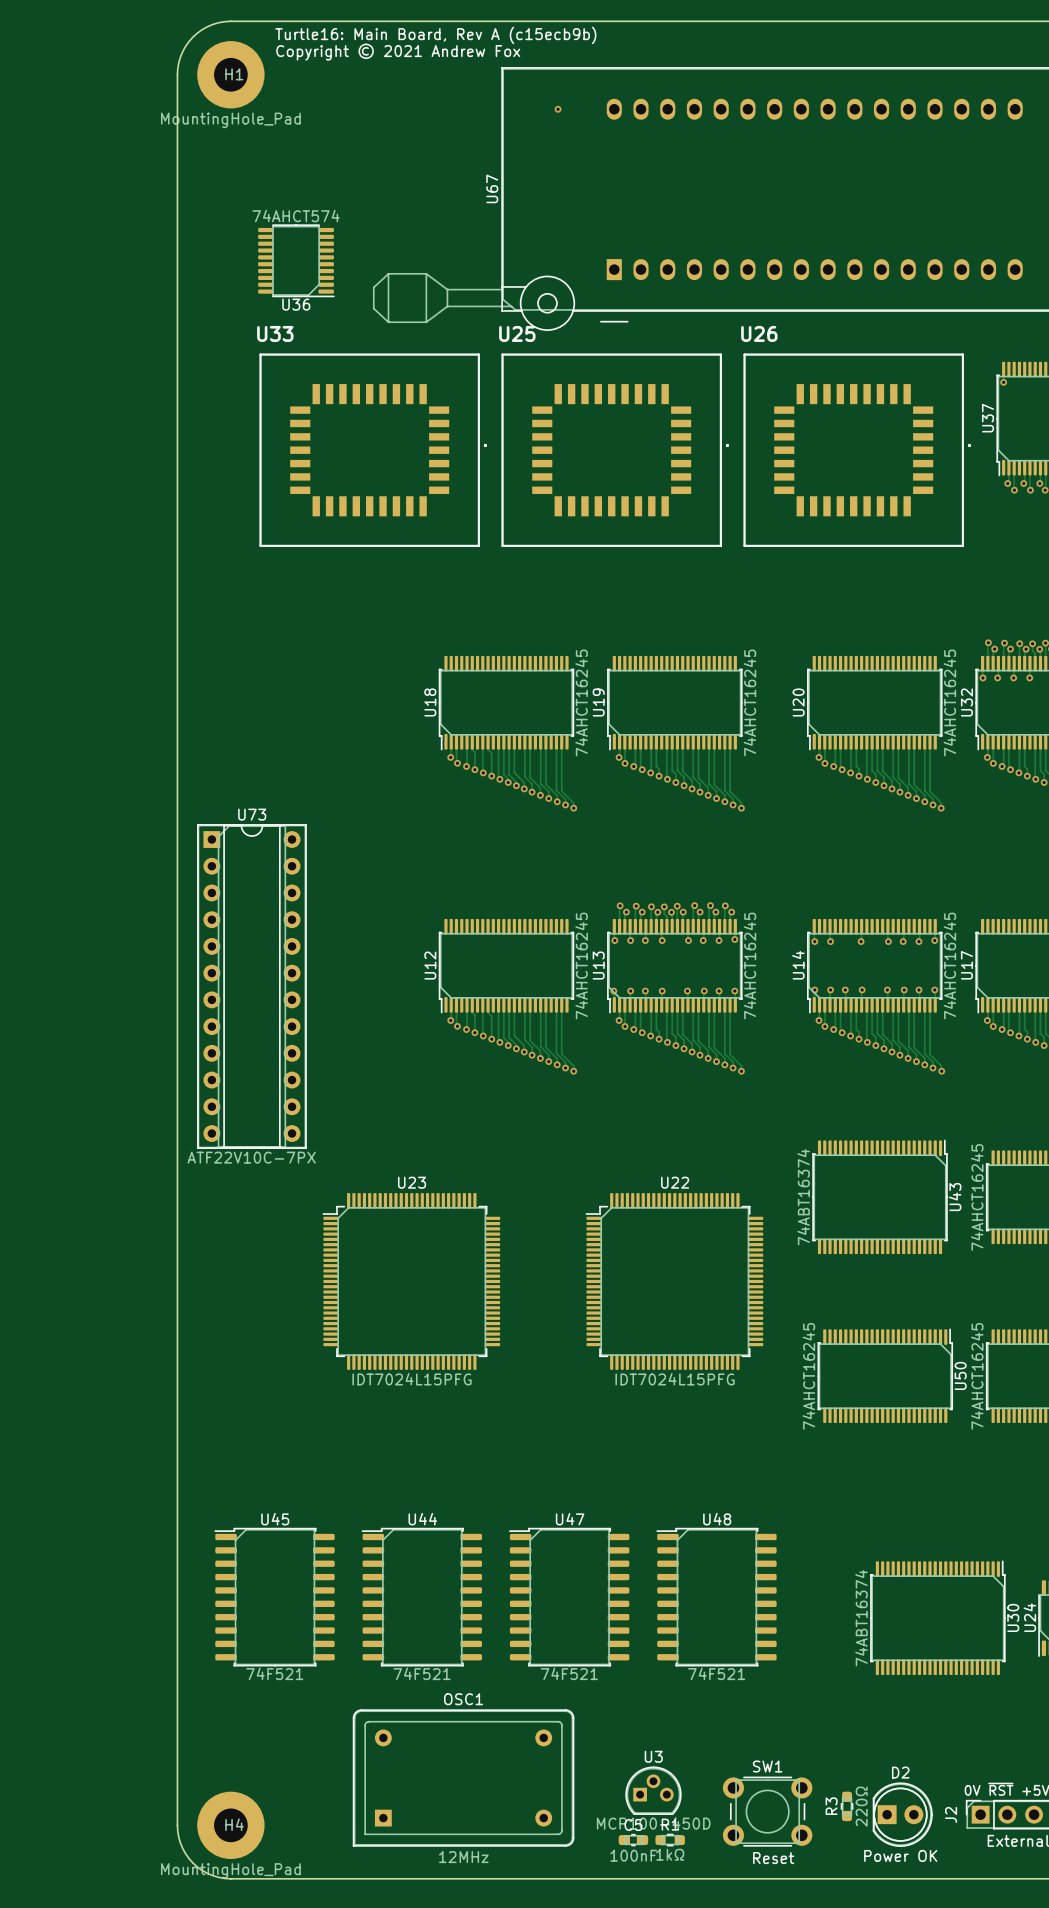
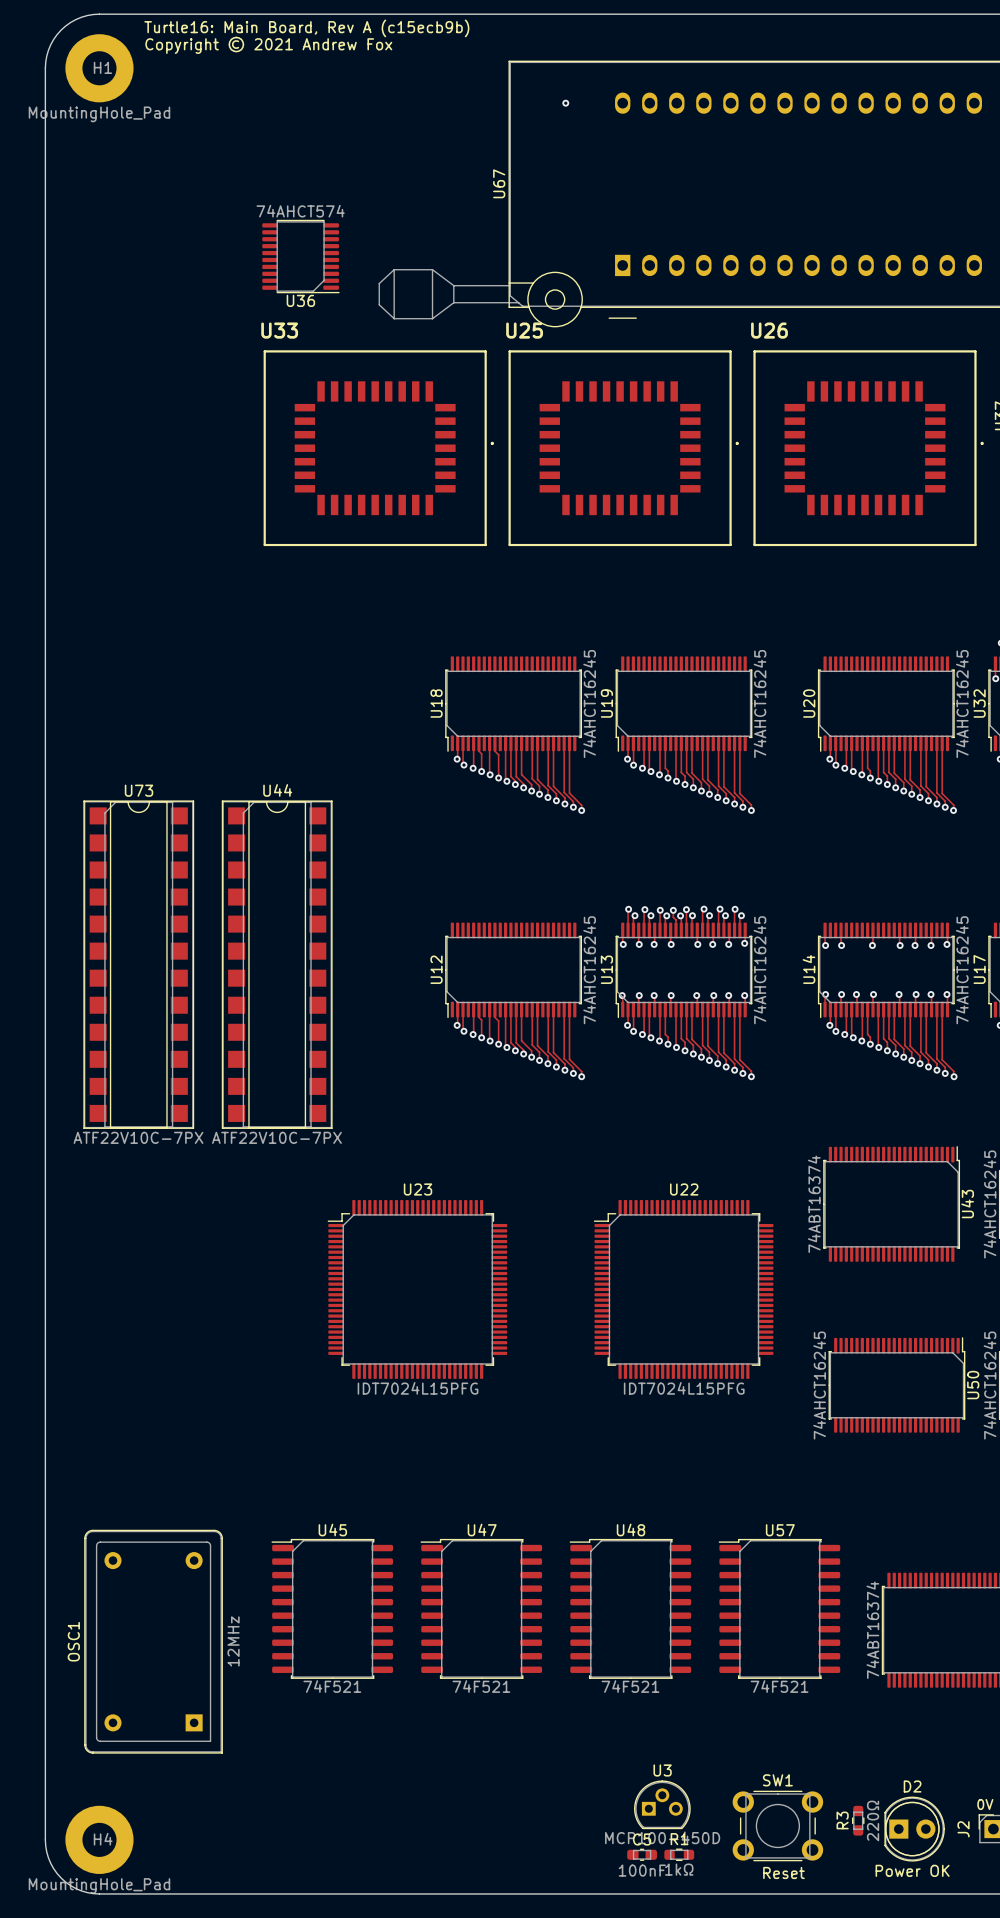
board edge: (230, 21) (207, 26) (193, 36) (182, 51) (177, 74) (177, 1825) (182, 1848) (193, 1863) (207, 1873) (230, 1878) -> (234, 14) (87, 15) (70, 22) (57, 34) (48, 50) (45, 68) (45, 1845) (50, 1863) (61, 1878) (70, 1885) (87, 1892) (234, 1893)
text position: Turtle16: Main Board, Rev A (c15ecb9b) (435, 35) -> Turtle16: Main Board, Rev A (c15ecb9b) (306, 28)
text position: Copyright © 2021 Andrew Fox (398, 52) -> Copyright © 2021 Andrew Fox (268, 45)
H1 position: (230, 74) -> (99, 68)
U73 footprint: [197, 824, 307, 1149] -> [83, 800, 195, 1129]
U44 name position: U44 (422, 1519) -> U44 (277, 790)
U44 footprint: [361, 1528, 483, 1667] -> [221, 800, 333, 1129]
U45 position: (274, 1597) -> (332, 1608)
U47 position: (569, 1597) -> (481, 1608)
U48 position: (716, 1597) -> (630, 1608)
U57: none -> 74F521 (779, 1608)
U44 value: 74F521 (422, 1673) -> ATF22V10C-7PX (276, 1137)
OSC1 rotation: 0° (463, 1778) -> 90° counterclockwise (153, 1641)
OSC1 position: (463, 1778) -> (153, 1641)
H4 position: (230, 1825) -> (99, 1839)

